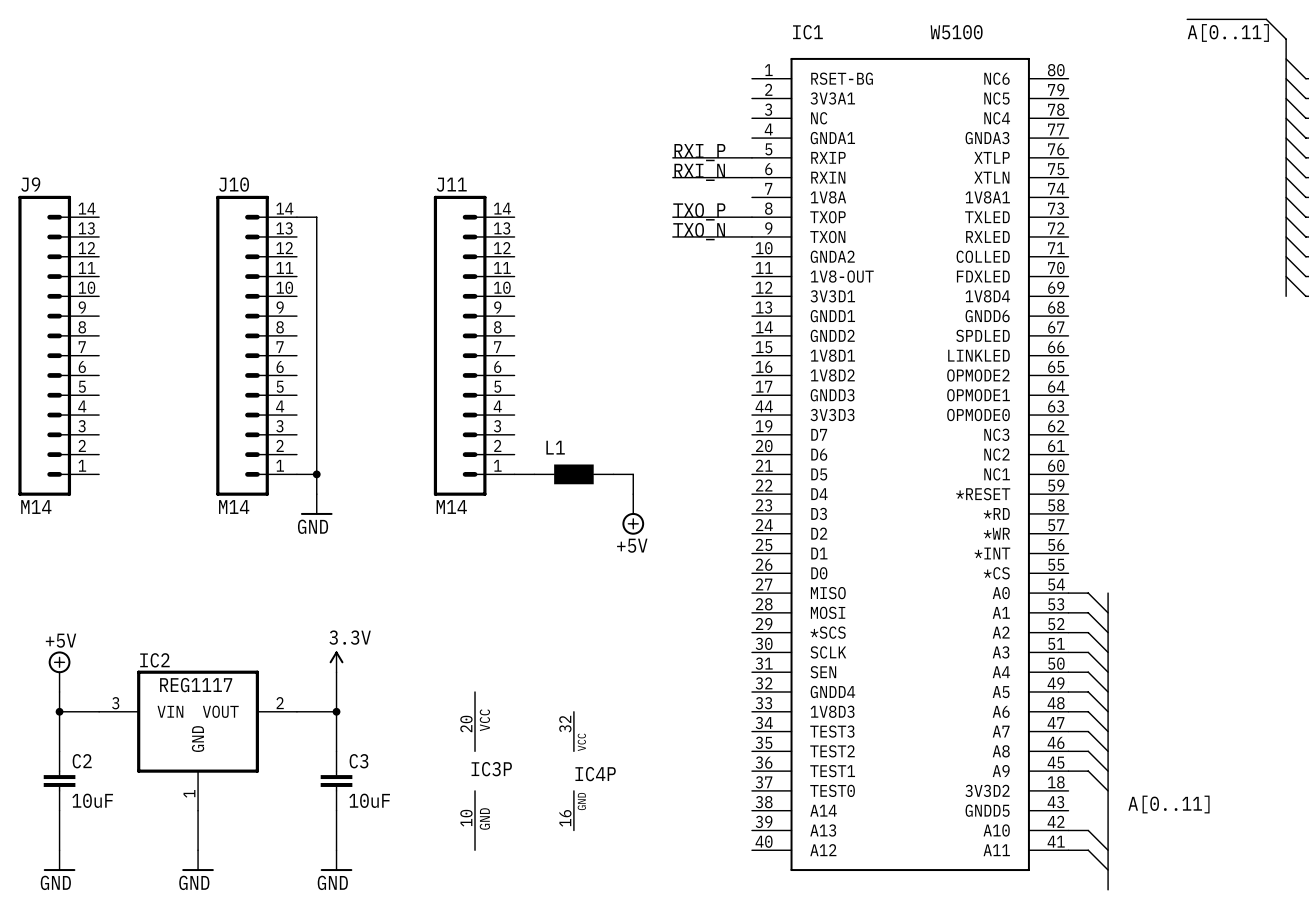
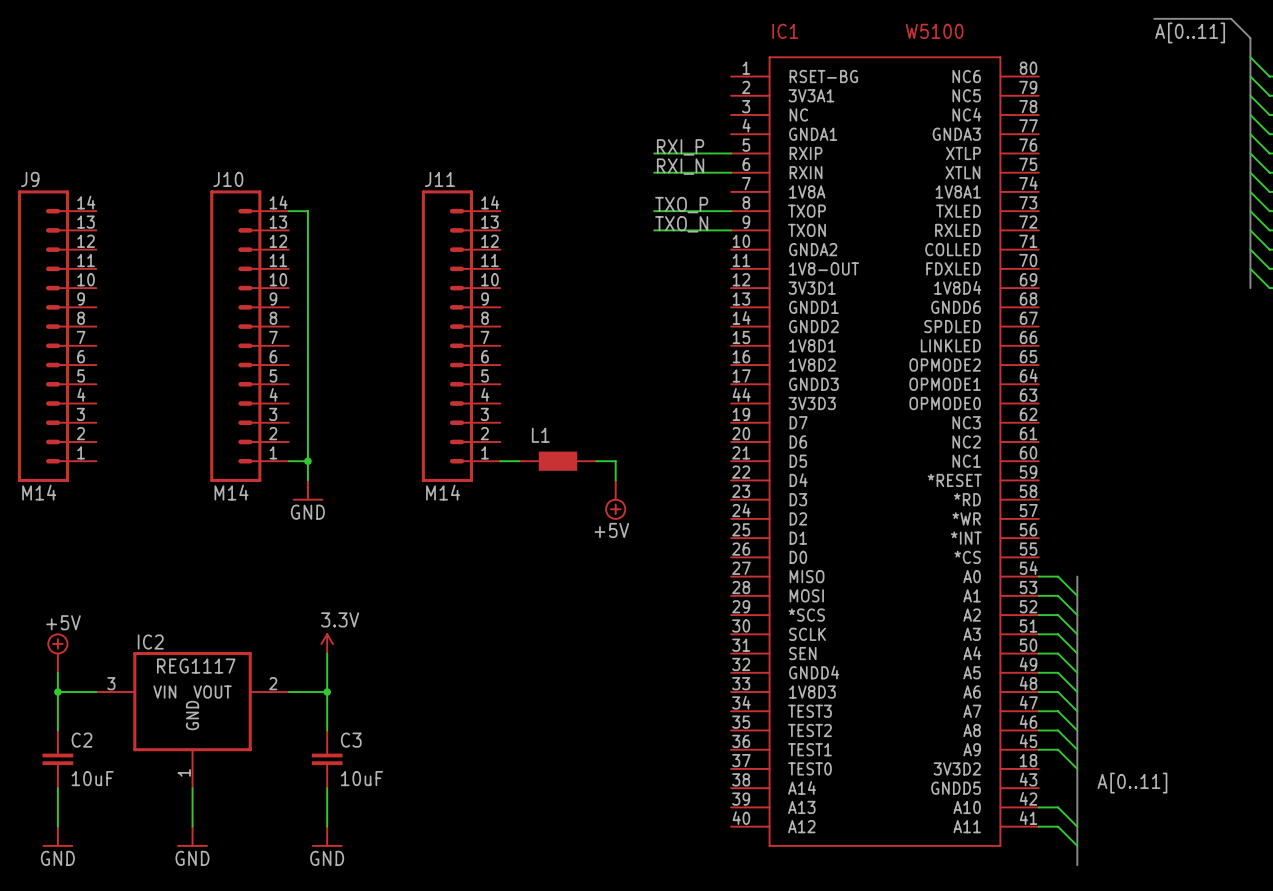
IC3P: (475, 771) -> none
IC4P: (573, 771) -> none

